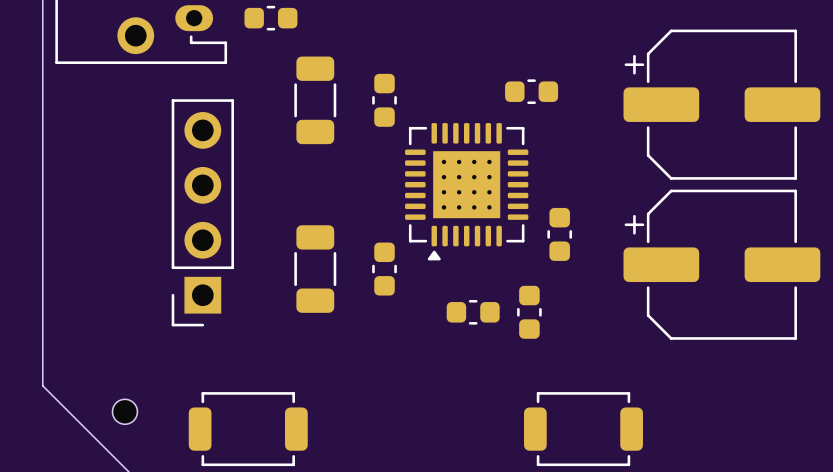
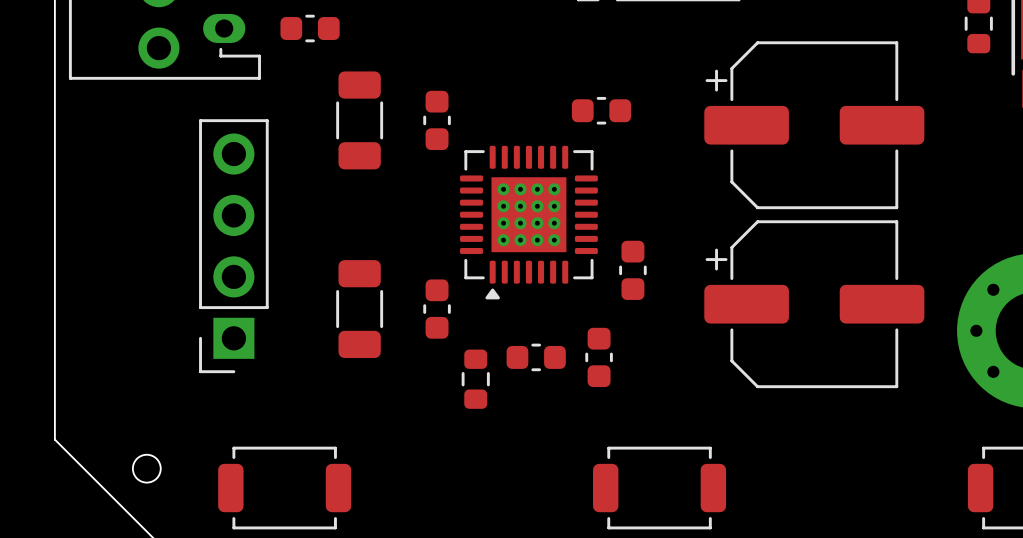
part: none -> (475, 379)

